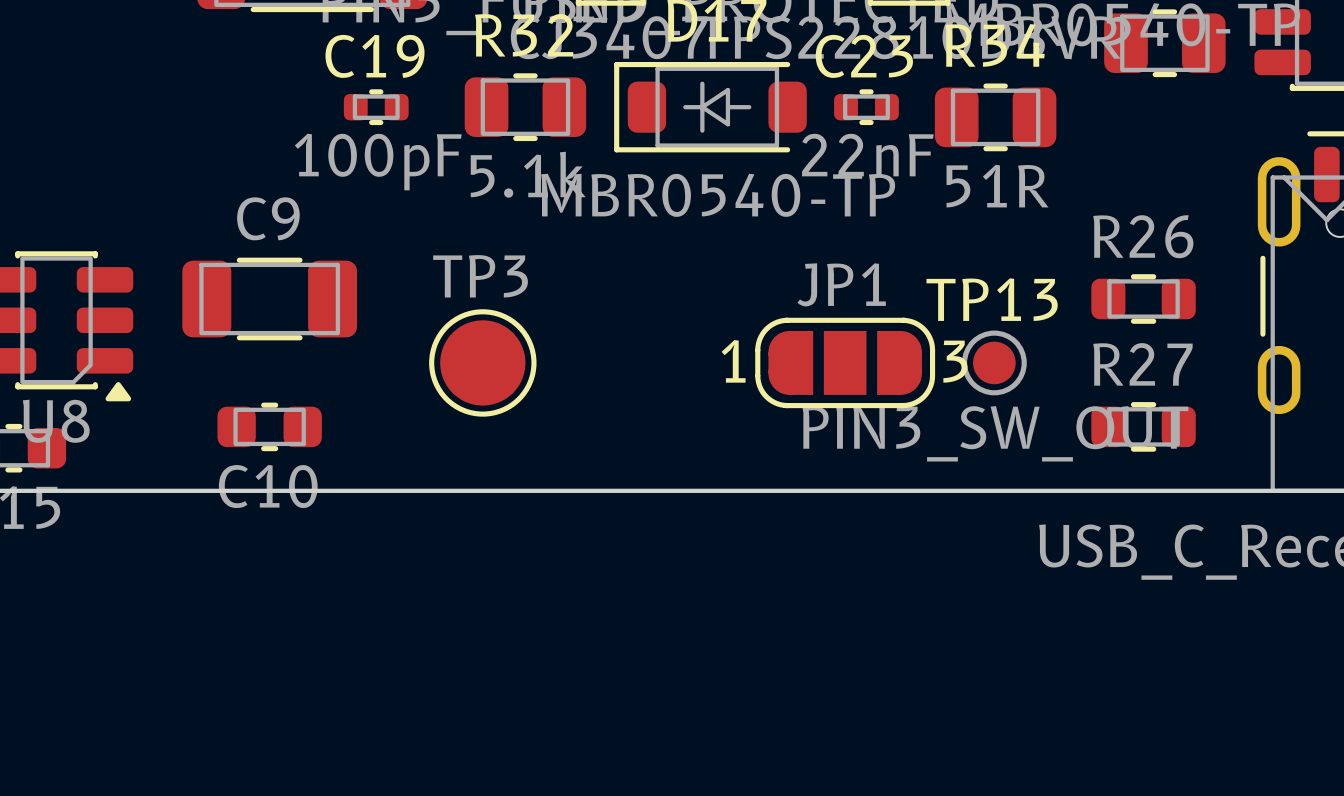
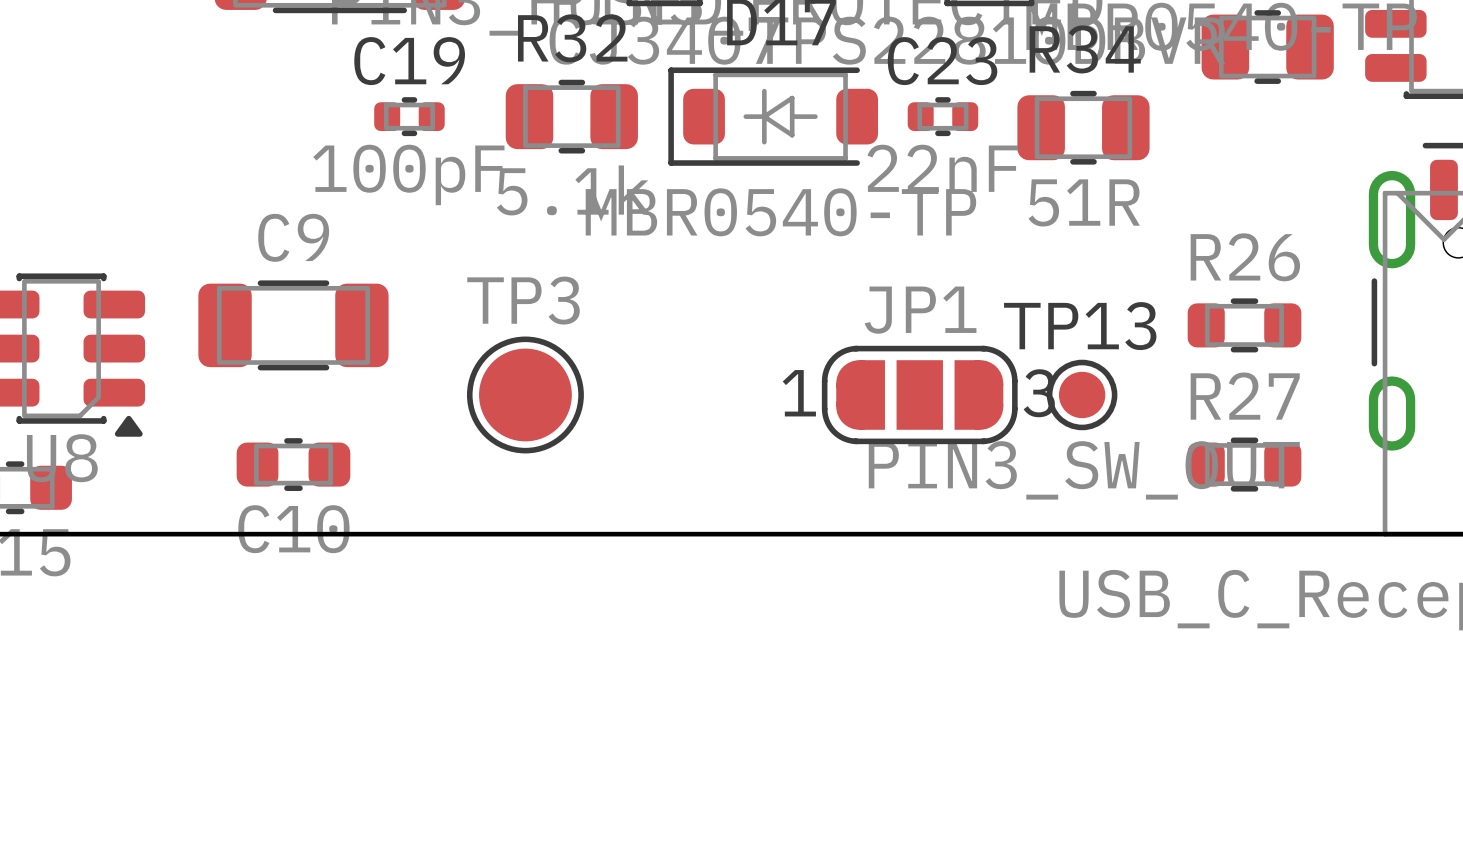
TP13 footprint: [961, 330, 1027, 396] -> [1046, 359, 1118, 431]

